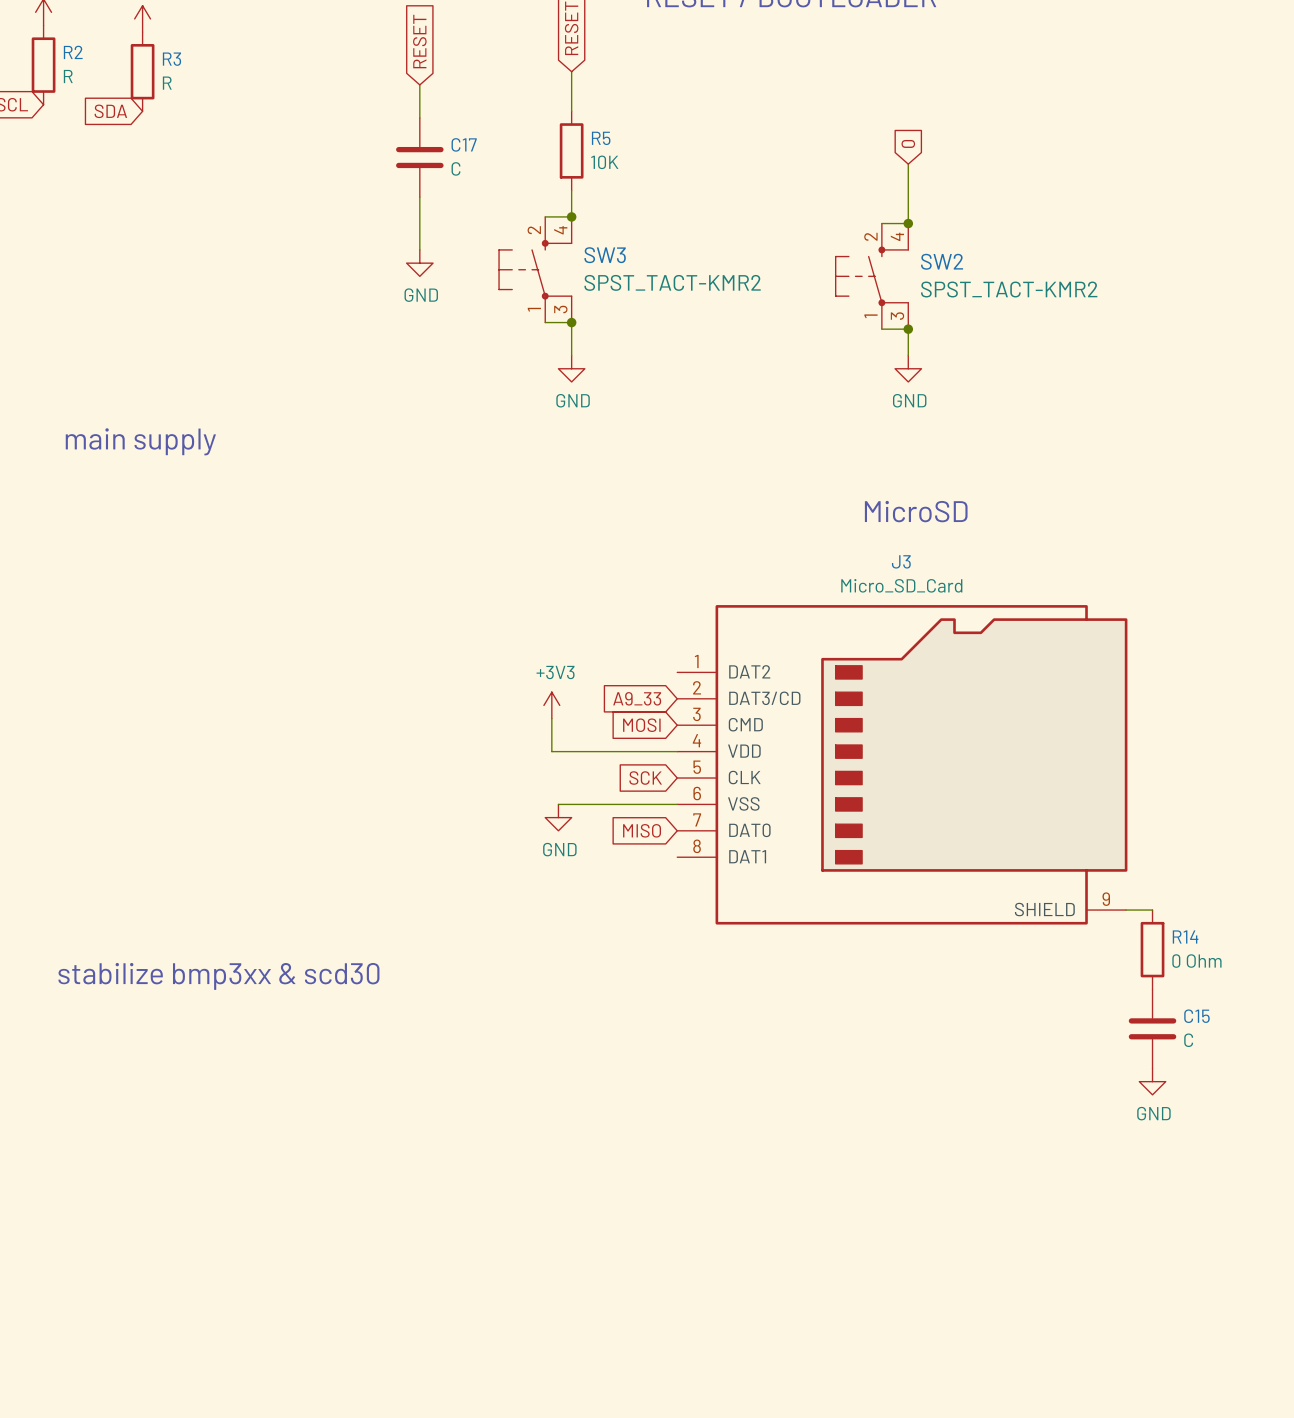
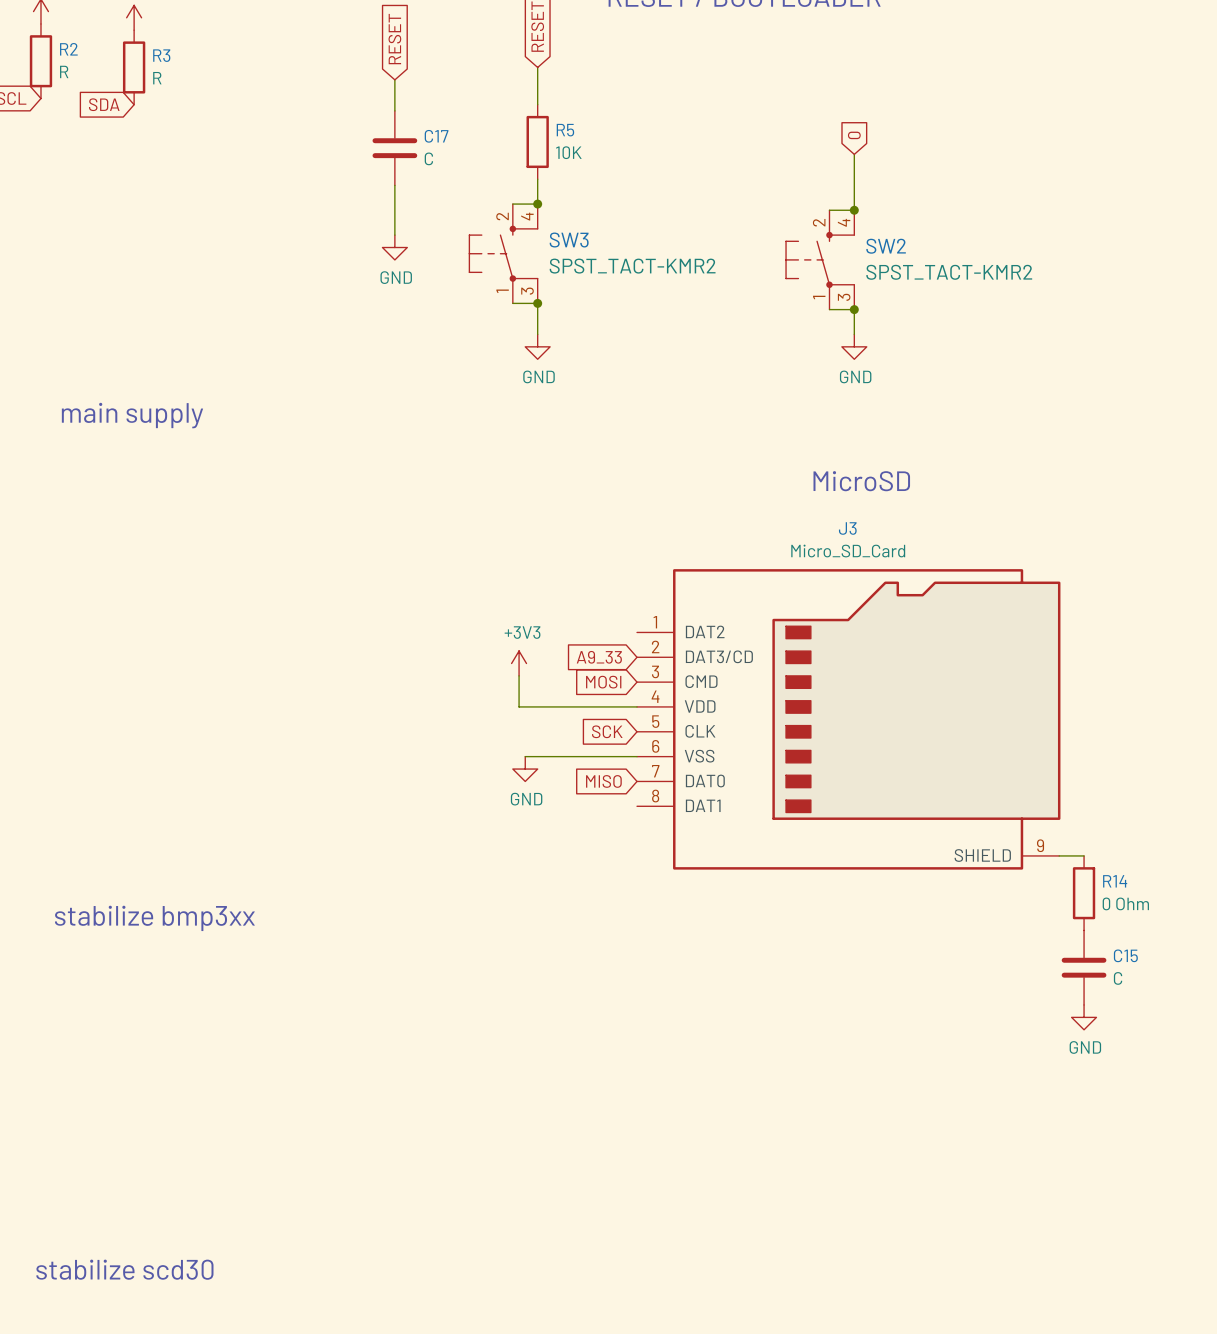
text: stabilize bmp3xx & scd30 (218, 976) -> stabilize bmp3xx (154, 918)
text: none -> stabilize scd30 (124, 1269)

